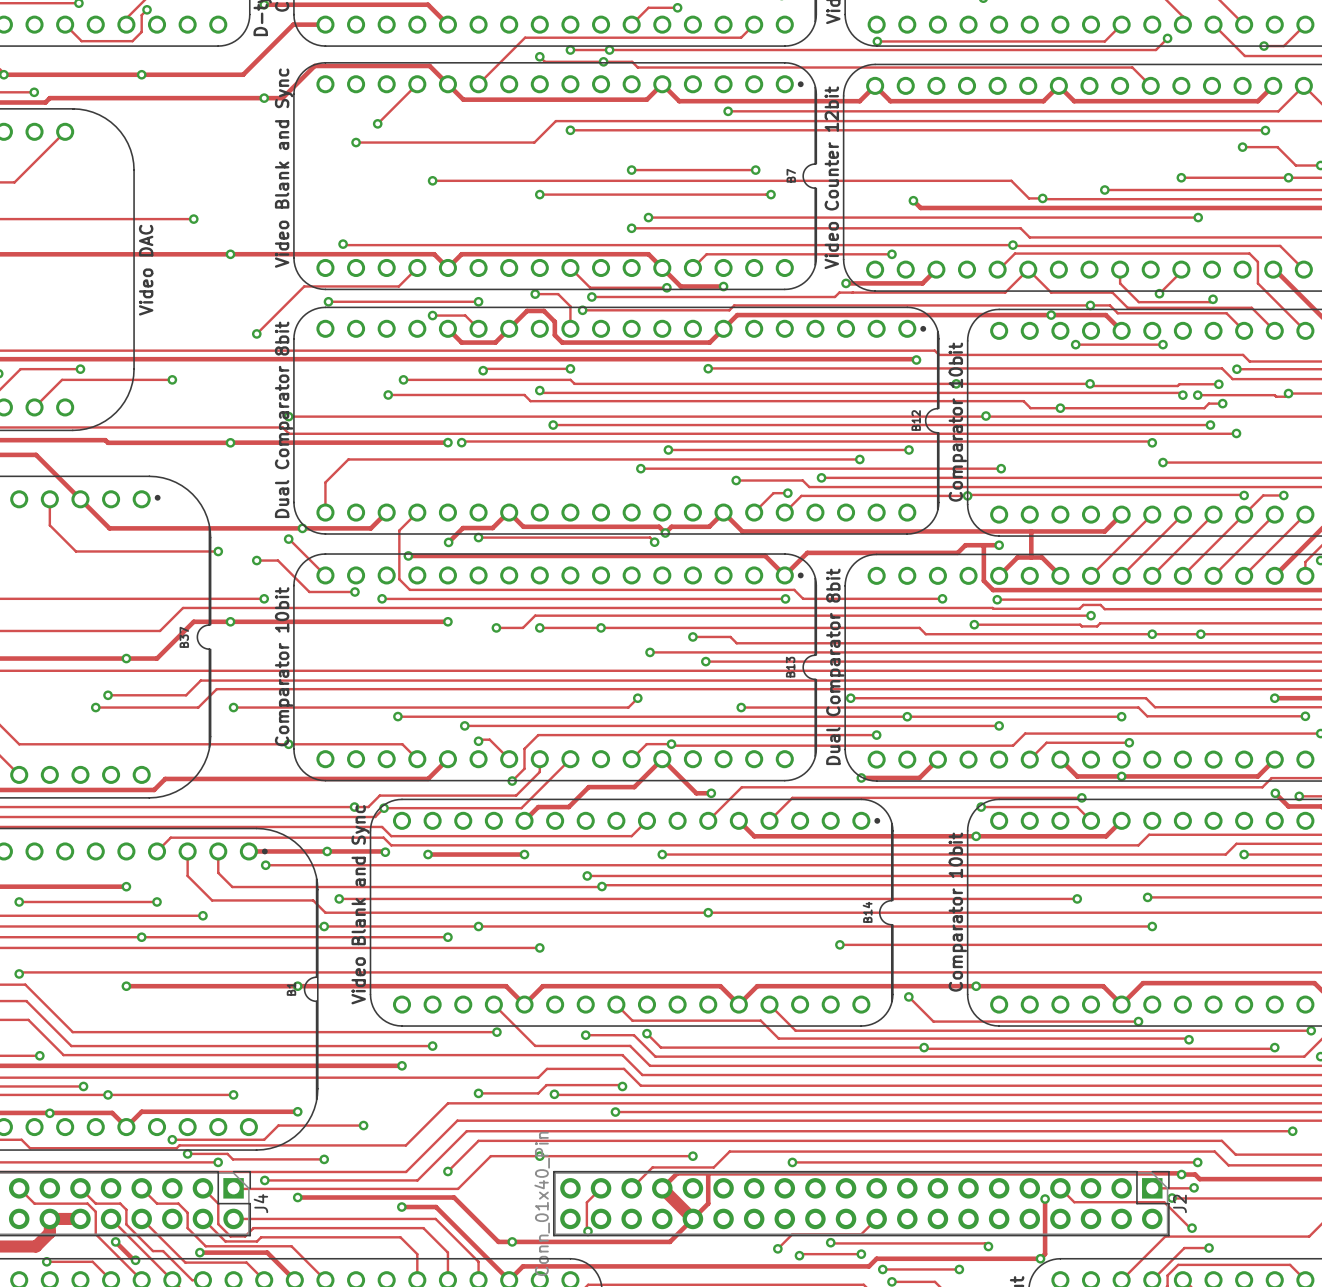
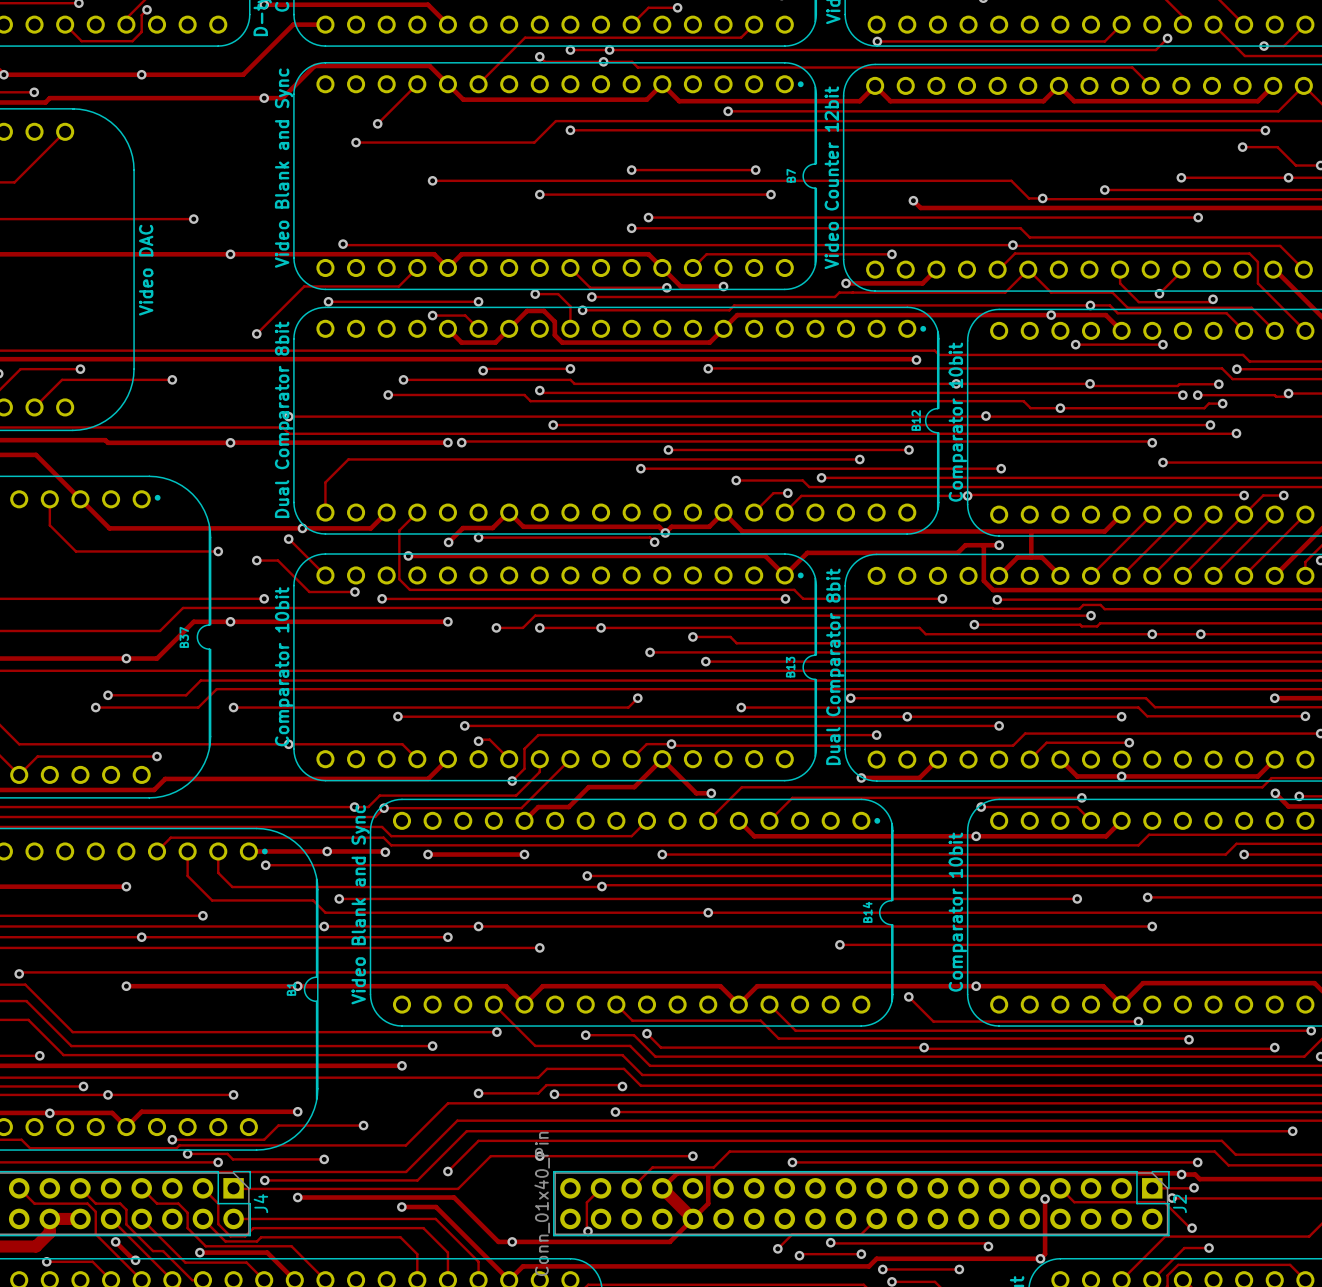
track: none -> (157, 756) (37, 756) (19, 774)
via: none -> (157, 756)
track: (19, 901) (157, 901) -> none
via: (19, 901) -> none
via: (157, 901) -> none

